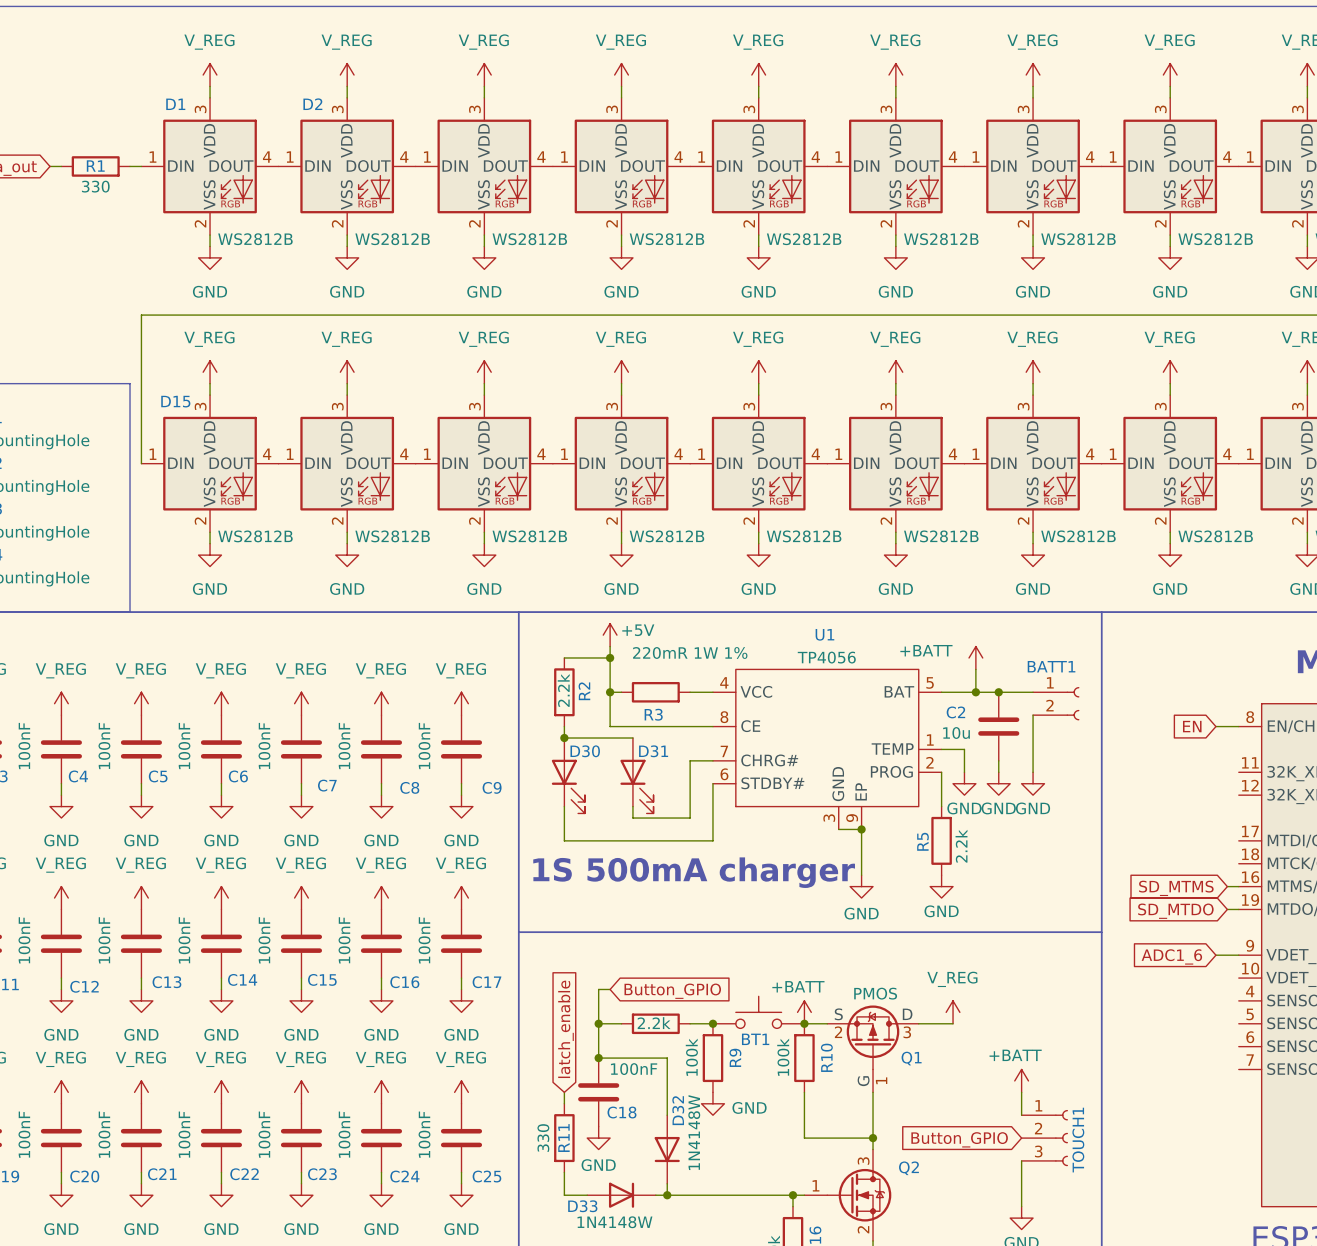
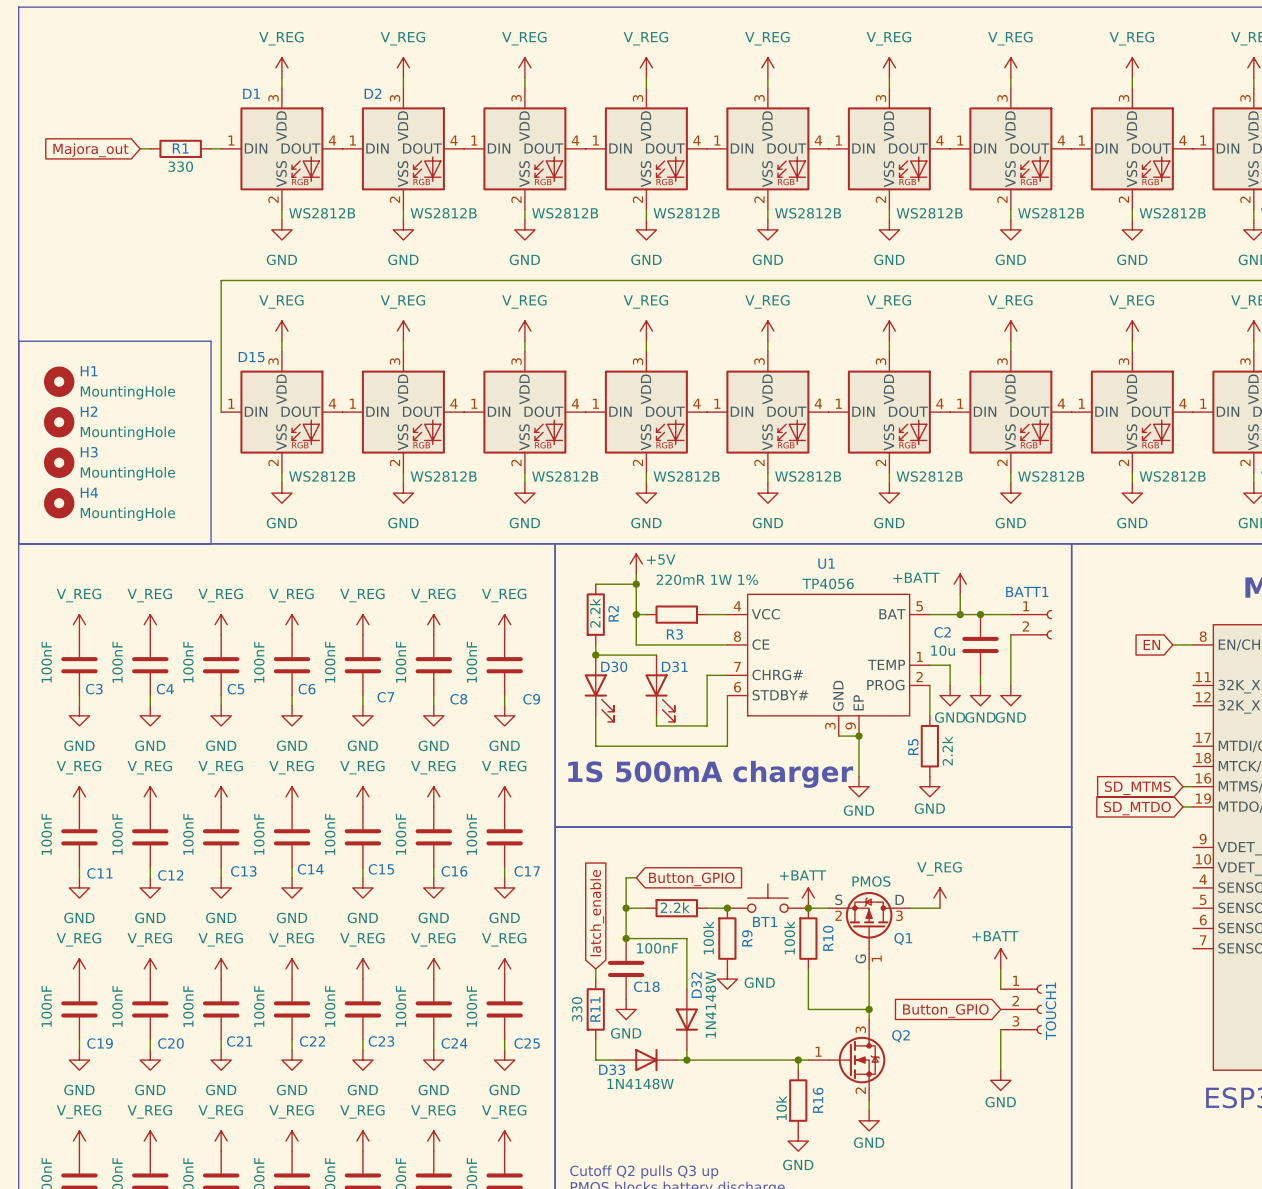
wire: (1215, 955) (1238, 955) -> none
global label: ADC1_6 (1171, 956) -> none

